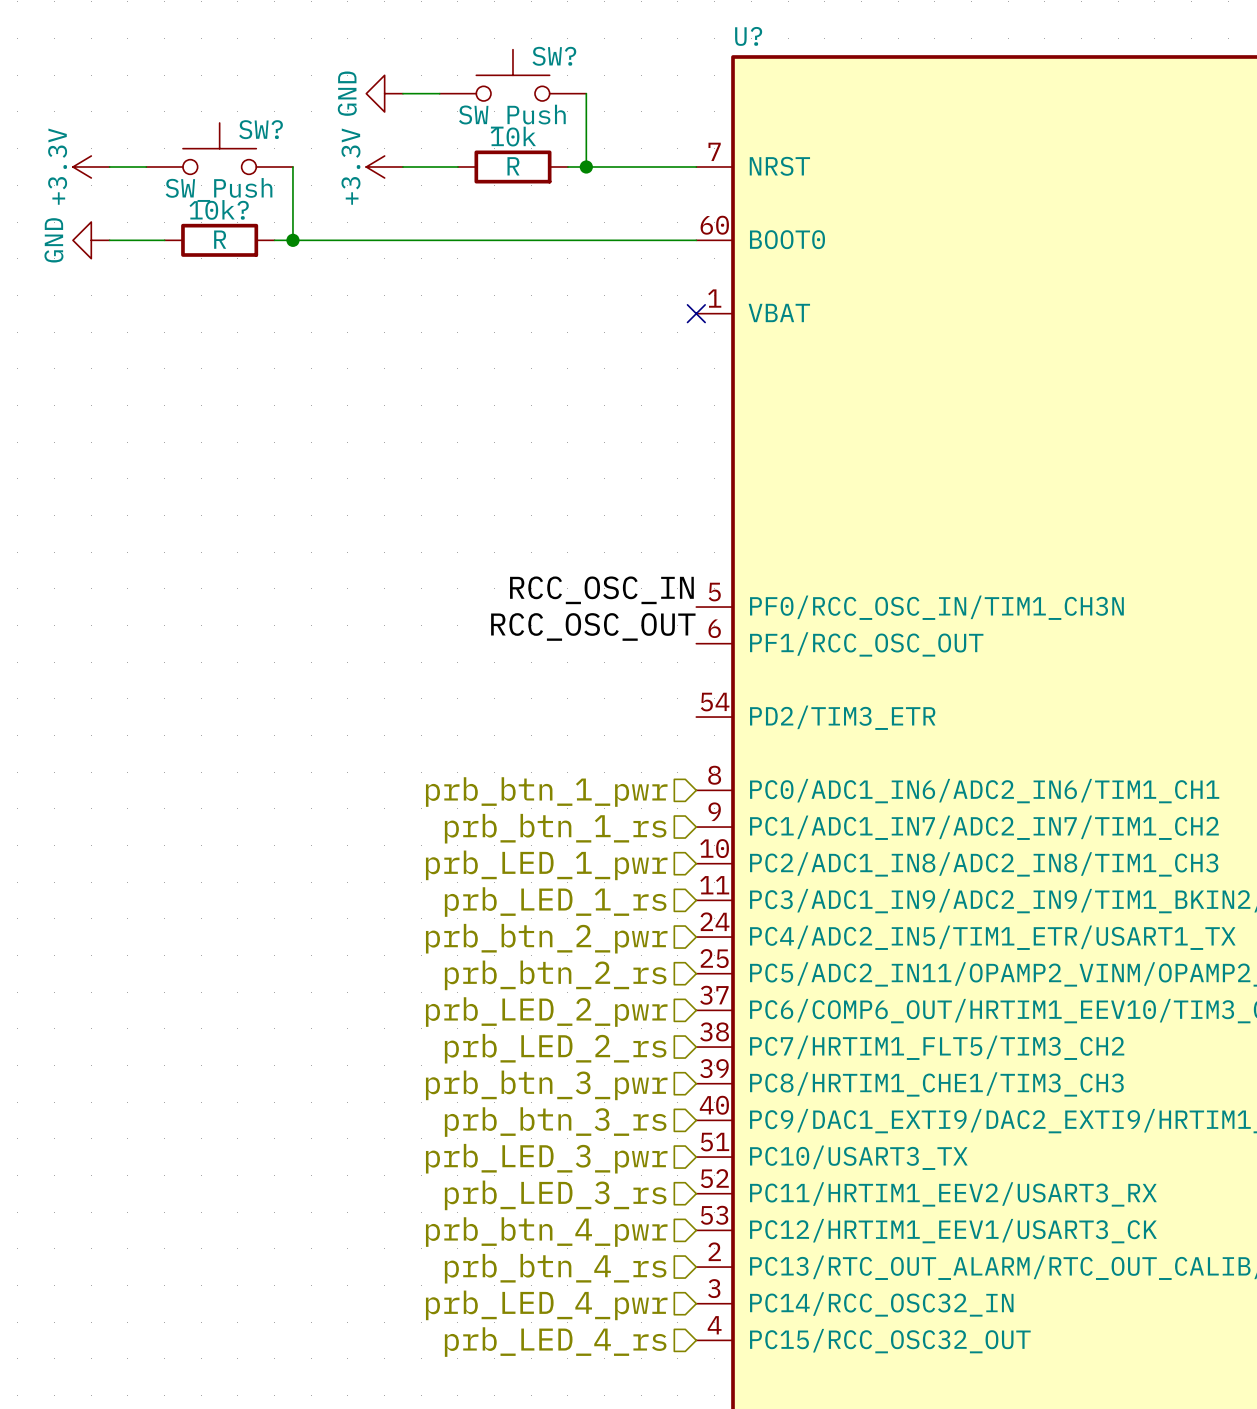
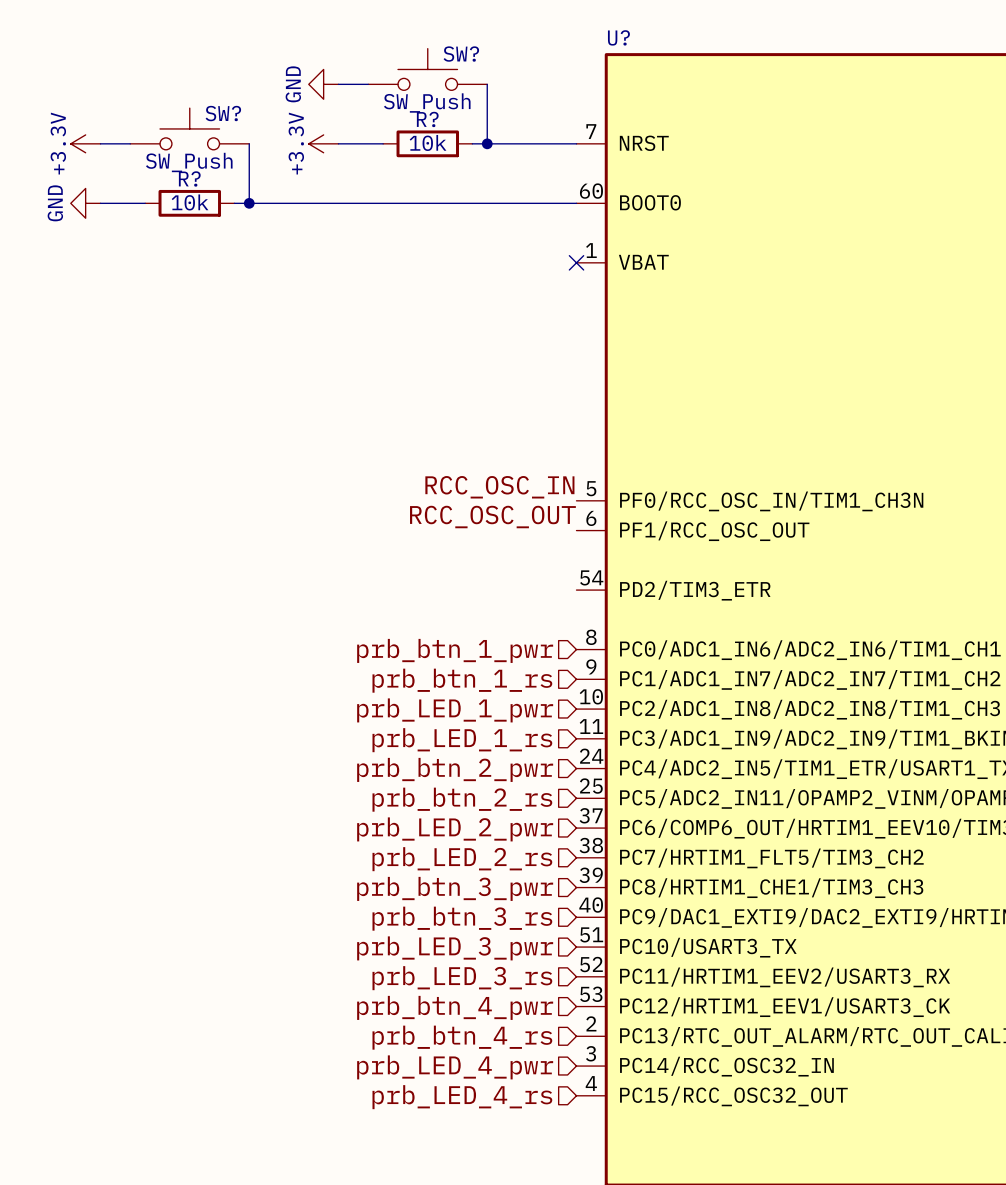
10k name: 10k (513, 136) -> R? (427, 119)
10k value: R (513, 166) -> 10k (428, 142)
10k? name: 10k? (219, 209) -> R? (189, 178)
10k? value: R (220, 239) -> 10k (190, 202)

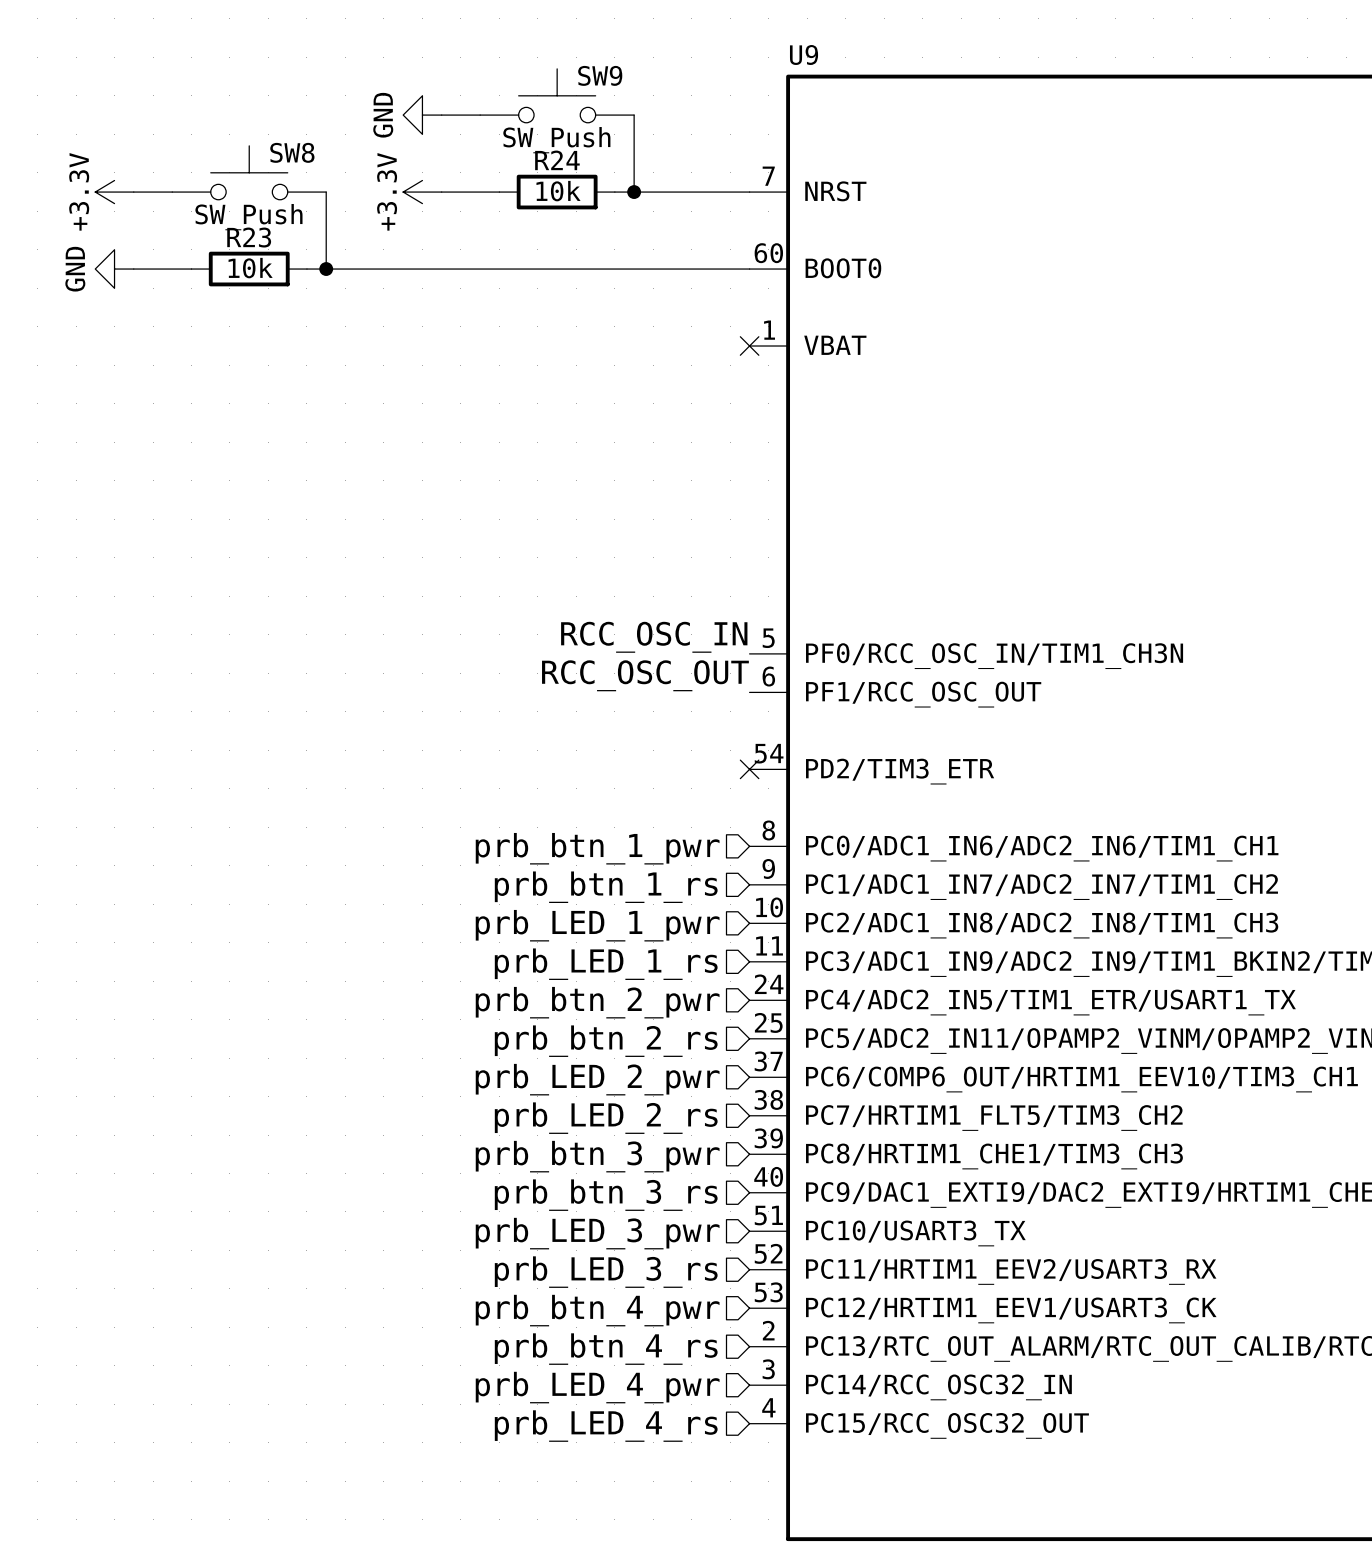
U? name: U? (618, 37) -> U9 (804, 55)
SW? name: SW? (461, 54) -> SW9 (600, 75)
SW? name: SW? (223, 113) -> SW8 (292, 152)
R? name: R? (427, 119) -> R24 (557, 160)
R? name: R? (189, 178) -> R23 (249, 237)
no-connect mark: none -> (749, 769)

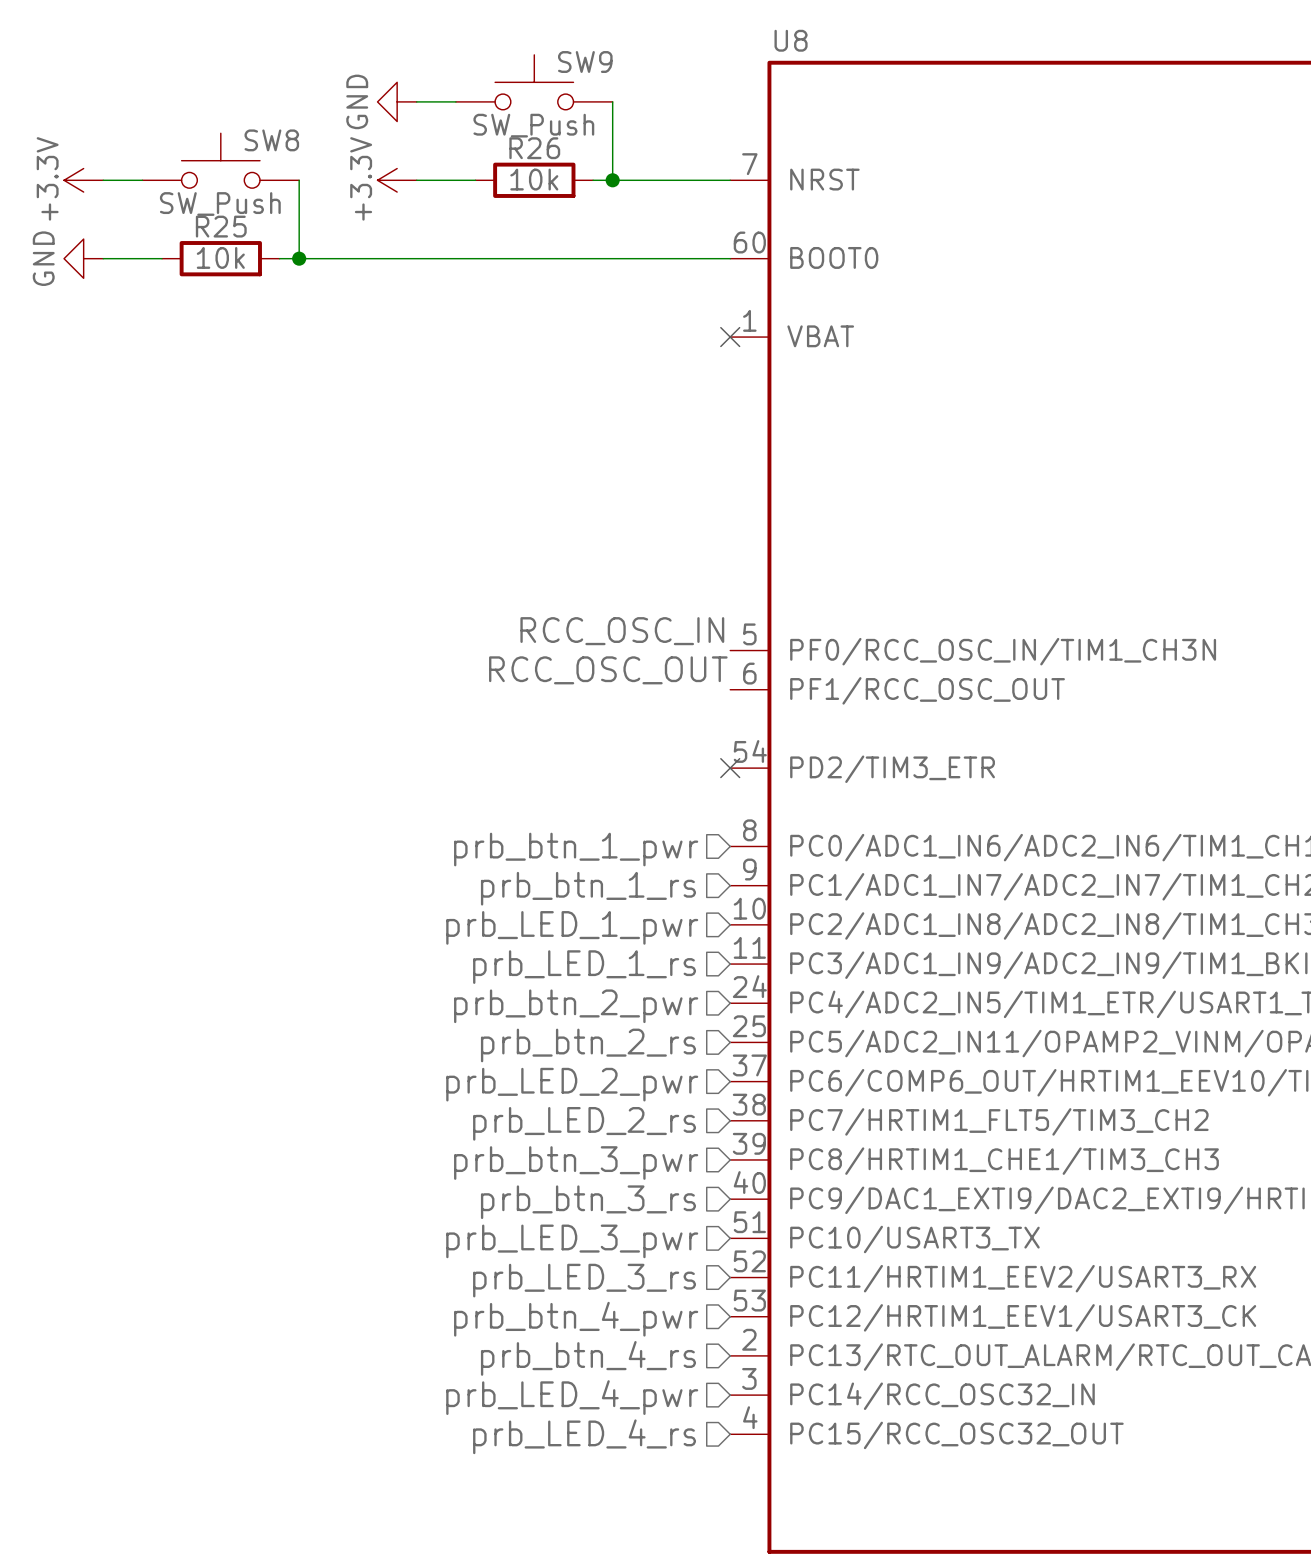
U9 name: U9 (804, 55) -> U8 (791, 40)
R24 name: R24 (557, 160) -> R26 (534, 148)
R23 name: R23 (249, 237) -> R25 (221, 226)

